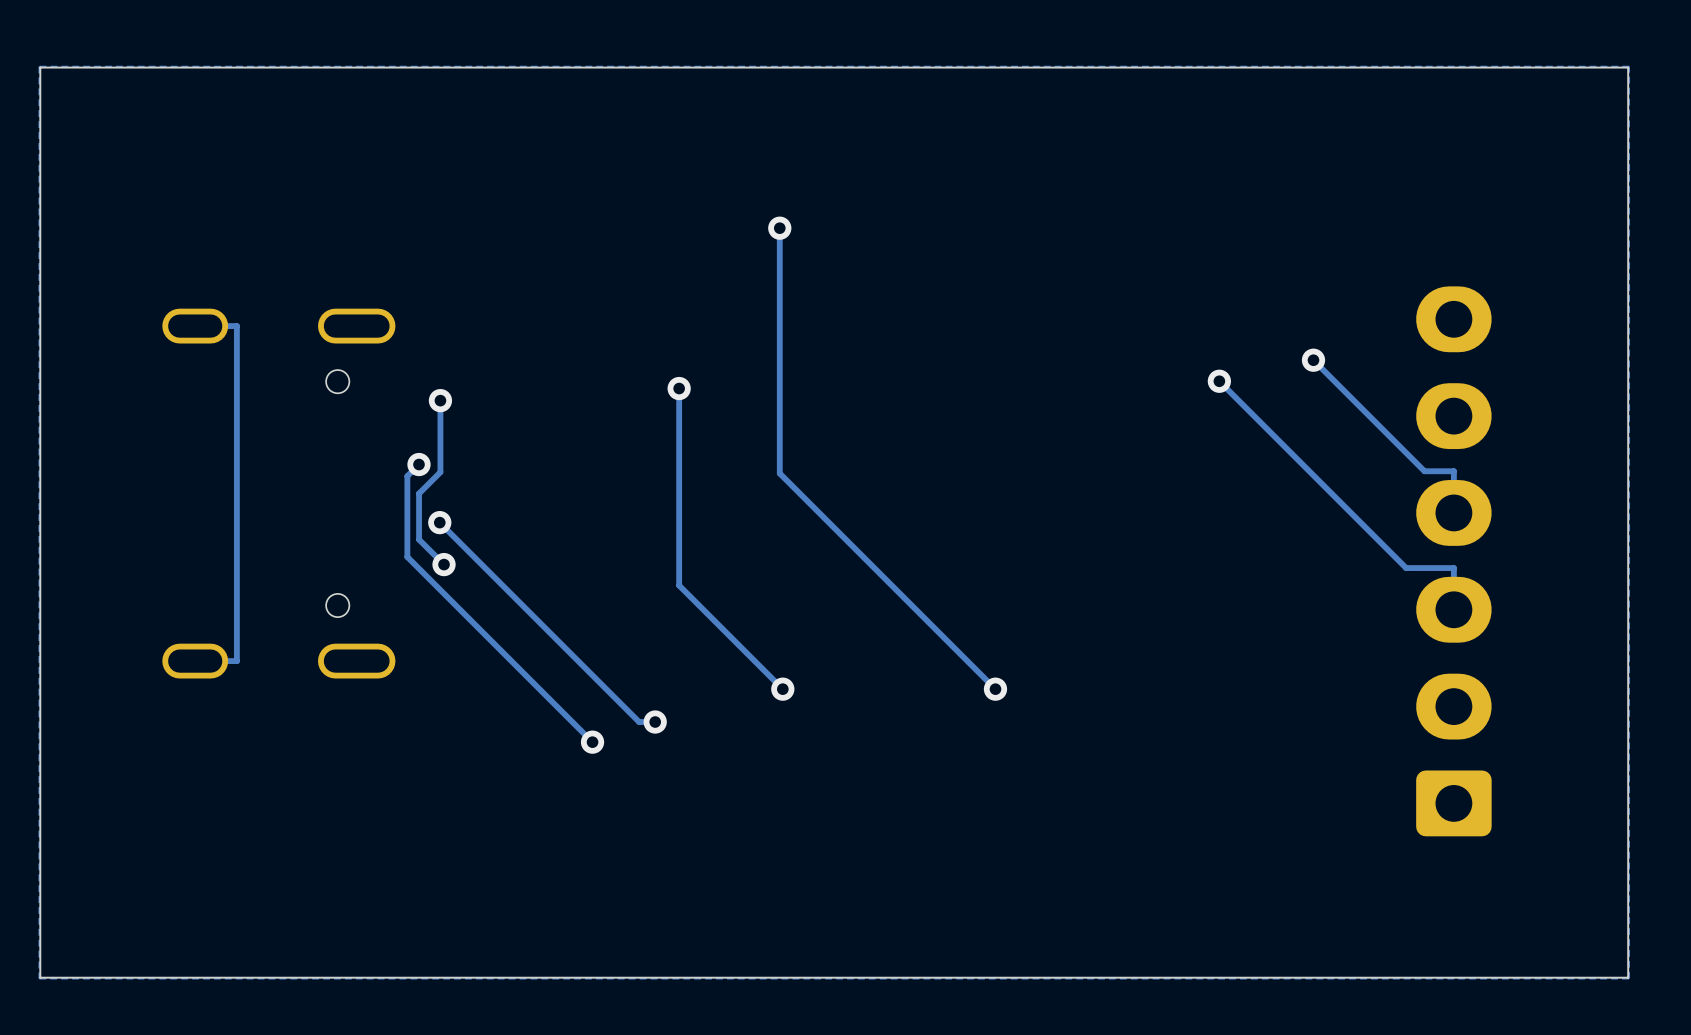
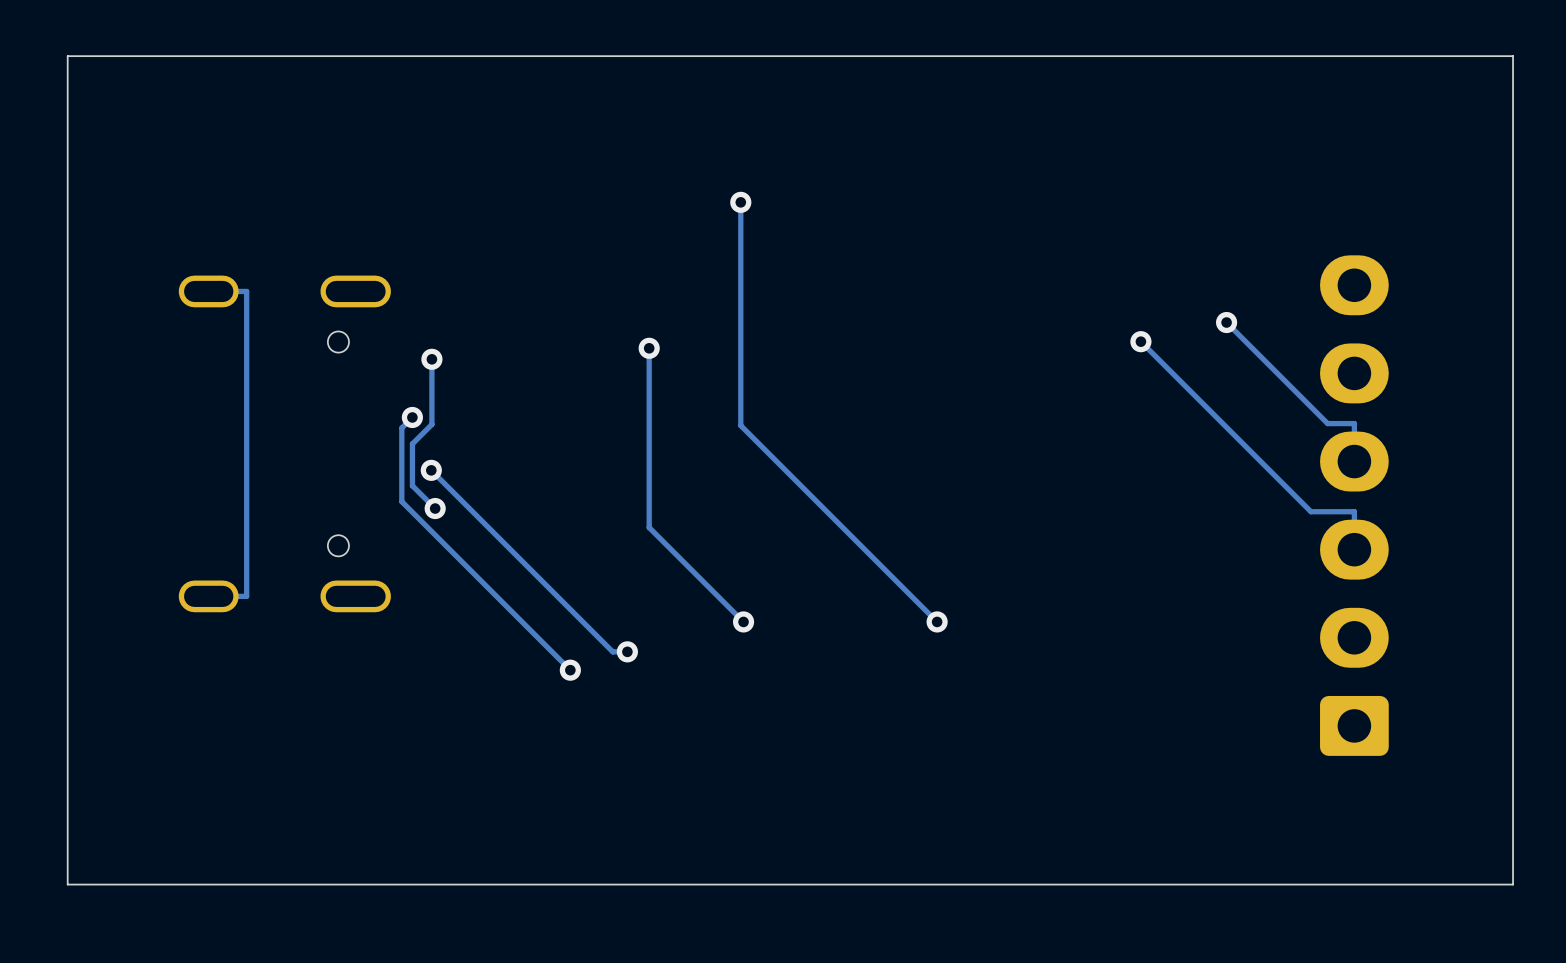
zone outline: (1629, 66) (39, 66) (39, 978) (1629, 978) (1629, 66) -> none

